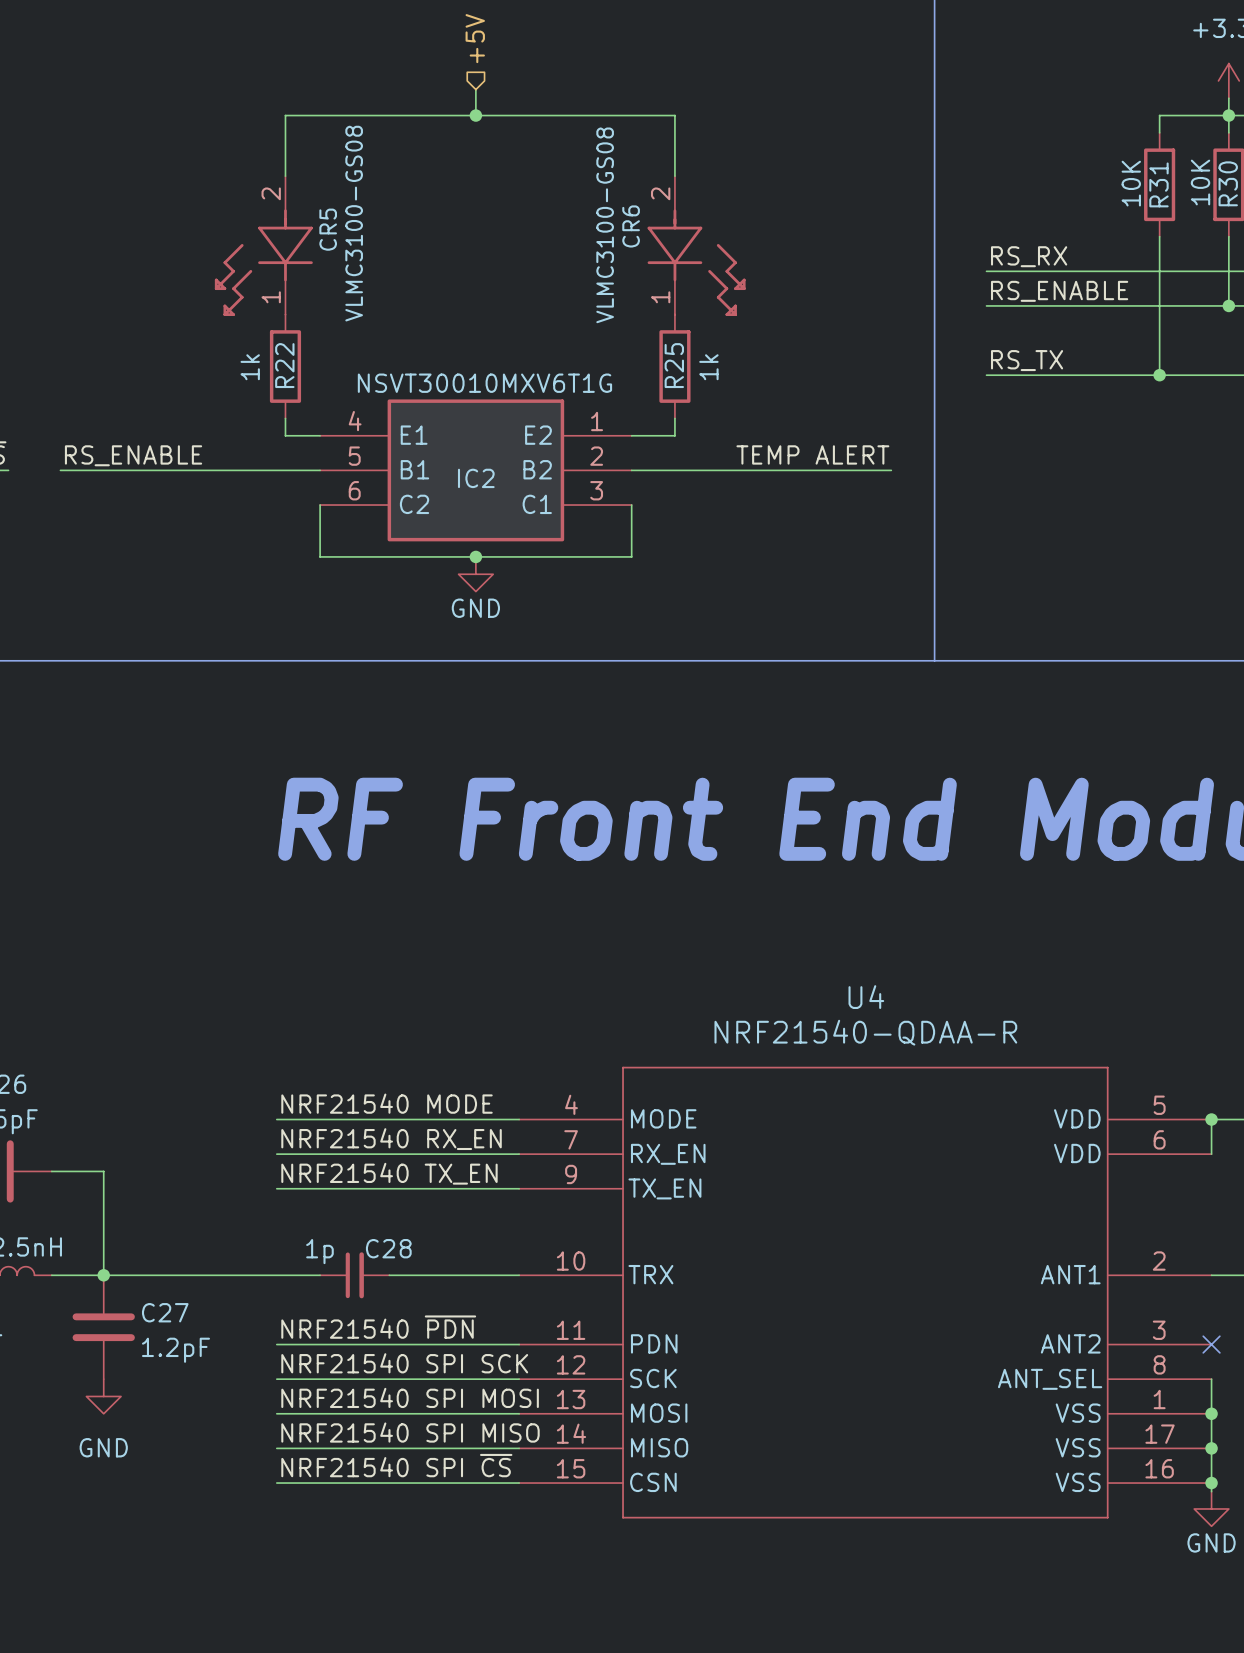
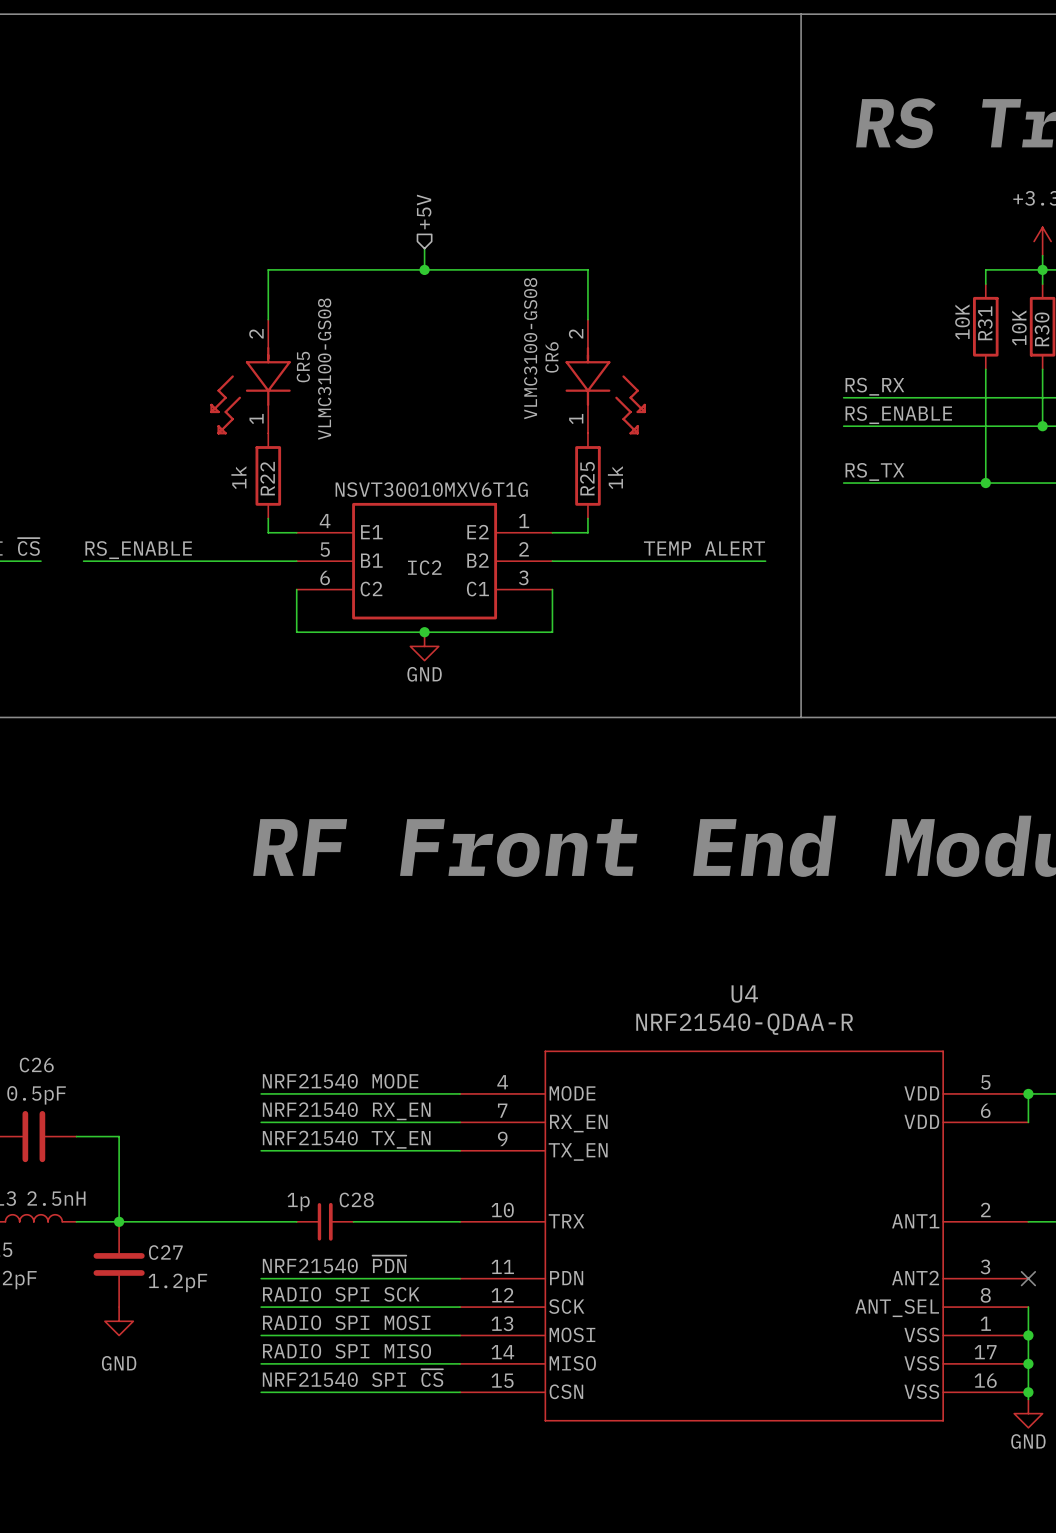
label: NRF21540 SPI SCK (404, 1363) -> RADIO SPI SCK (341, 1294)
label: NRF21540 SPI MOSI (410, 1397) -> RADIO SPI MOSI (346, 1322)
label: NRF21540 SPI MISO (410, 1432) -> RADIO SPI MISO (347, 1351)

